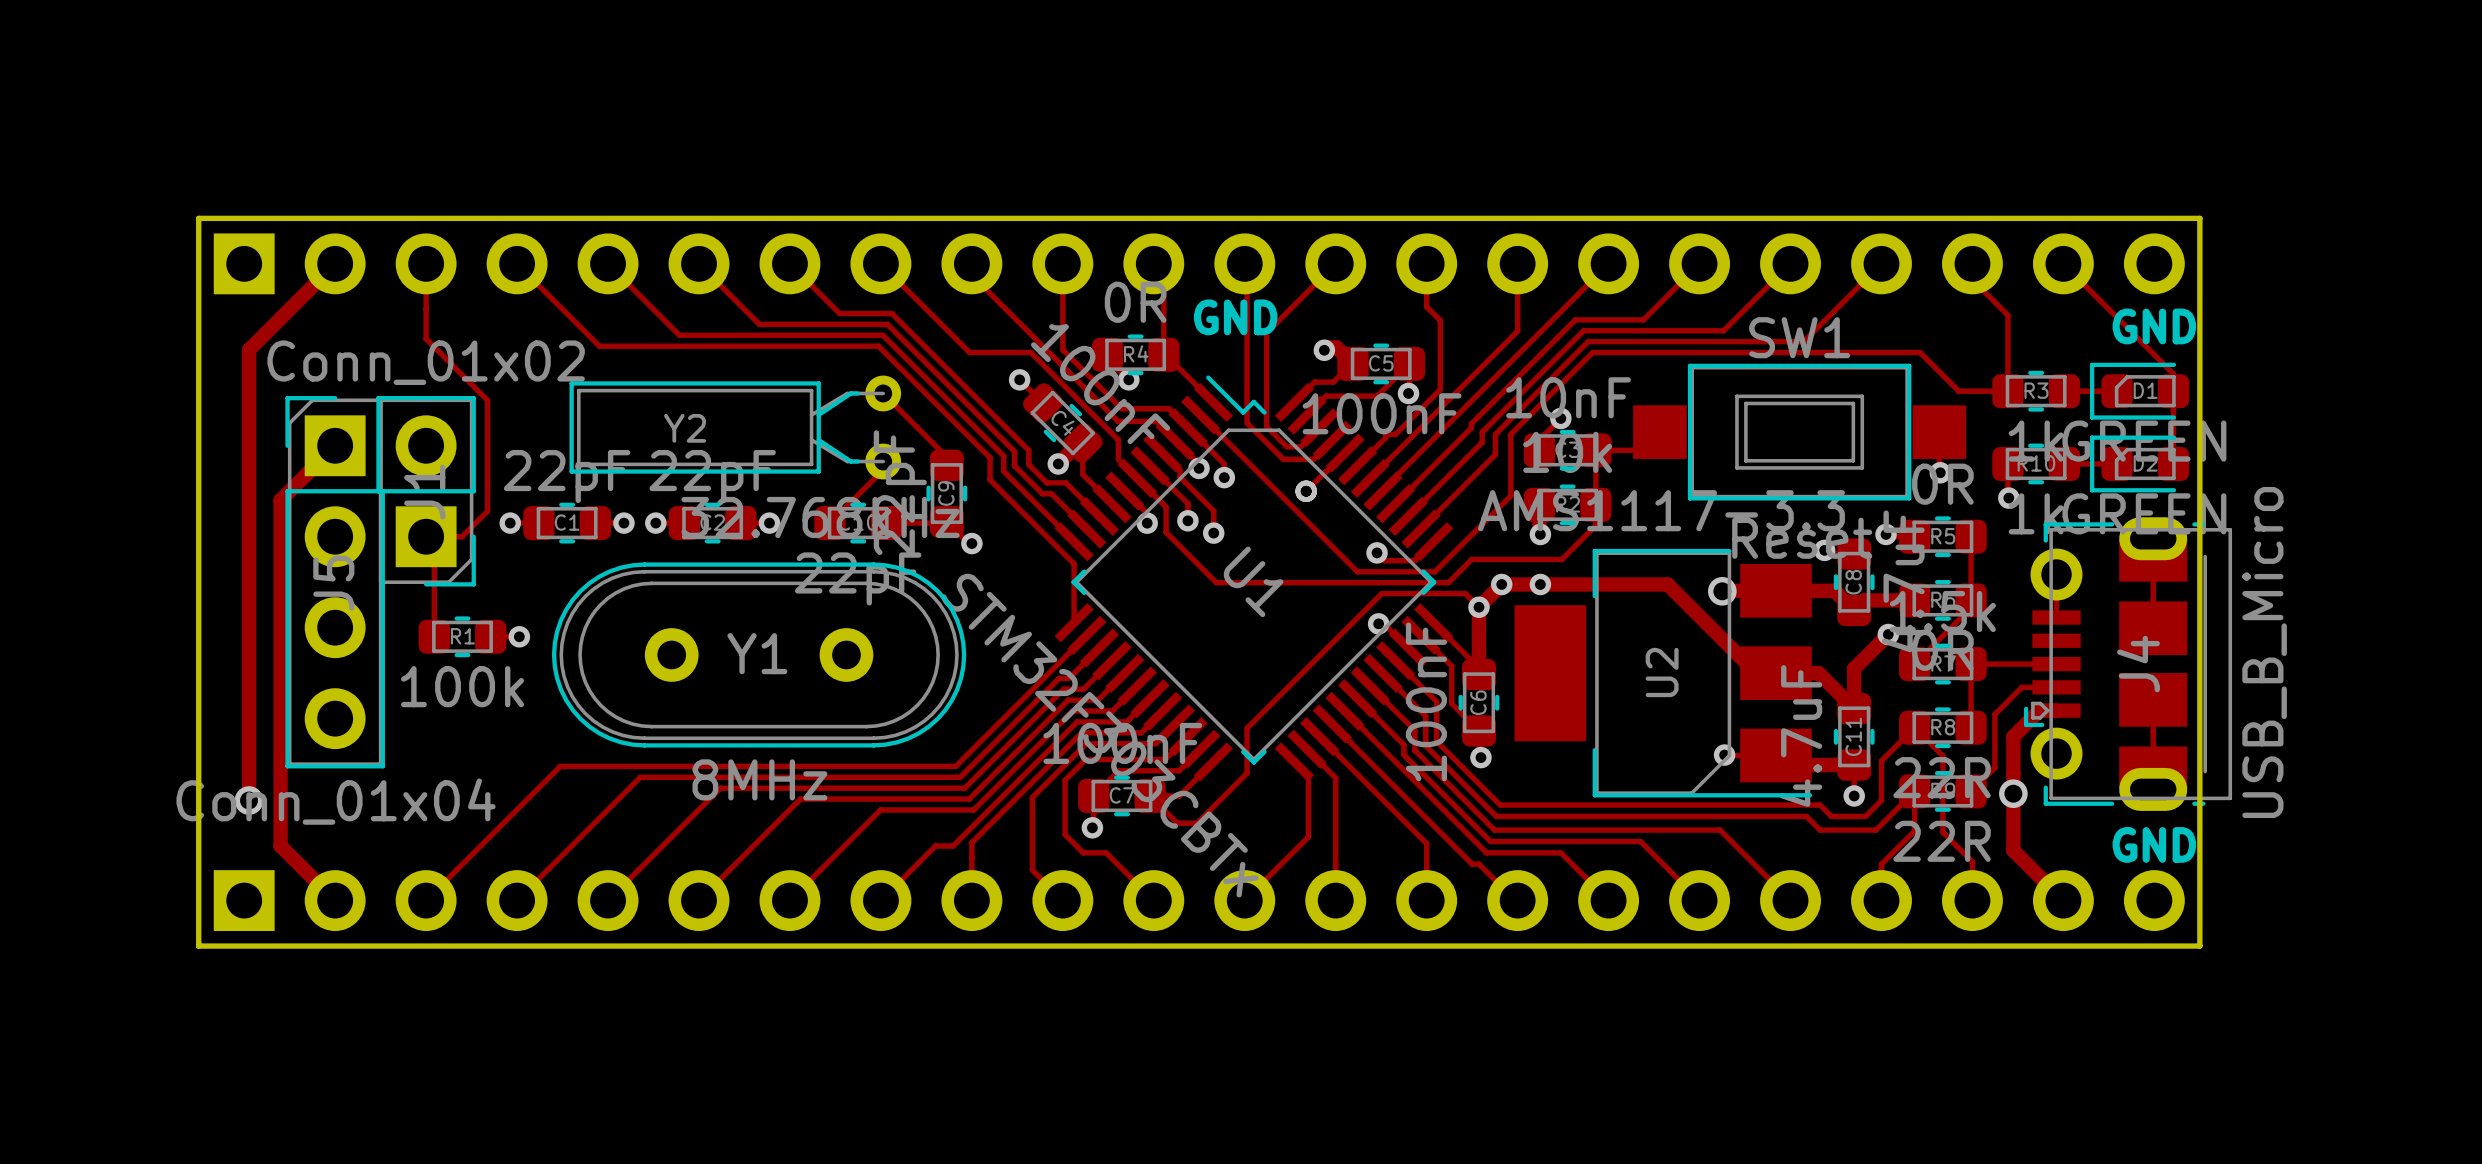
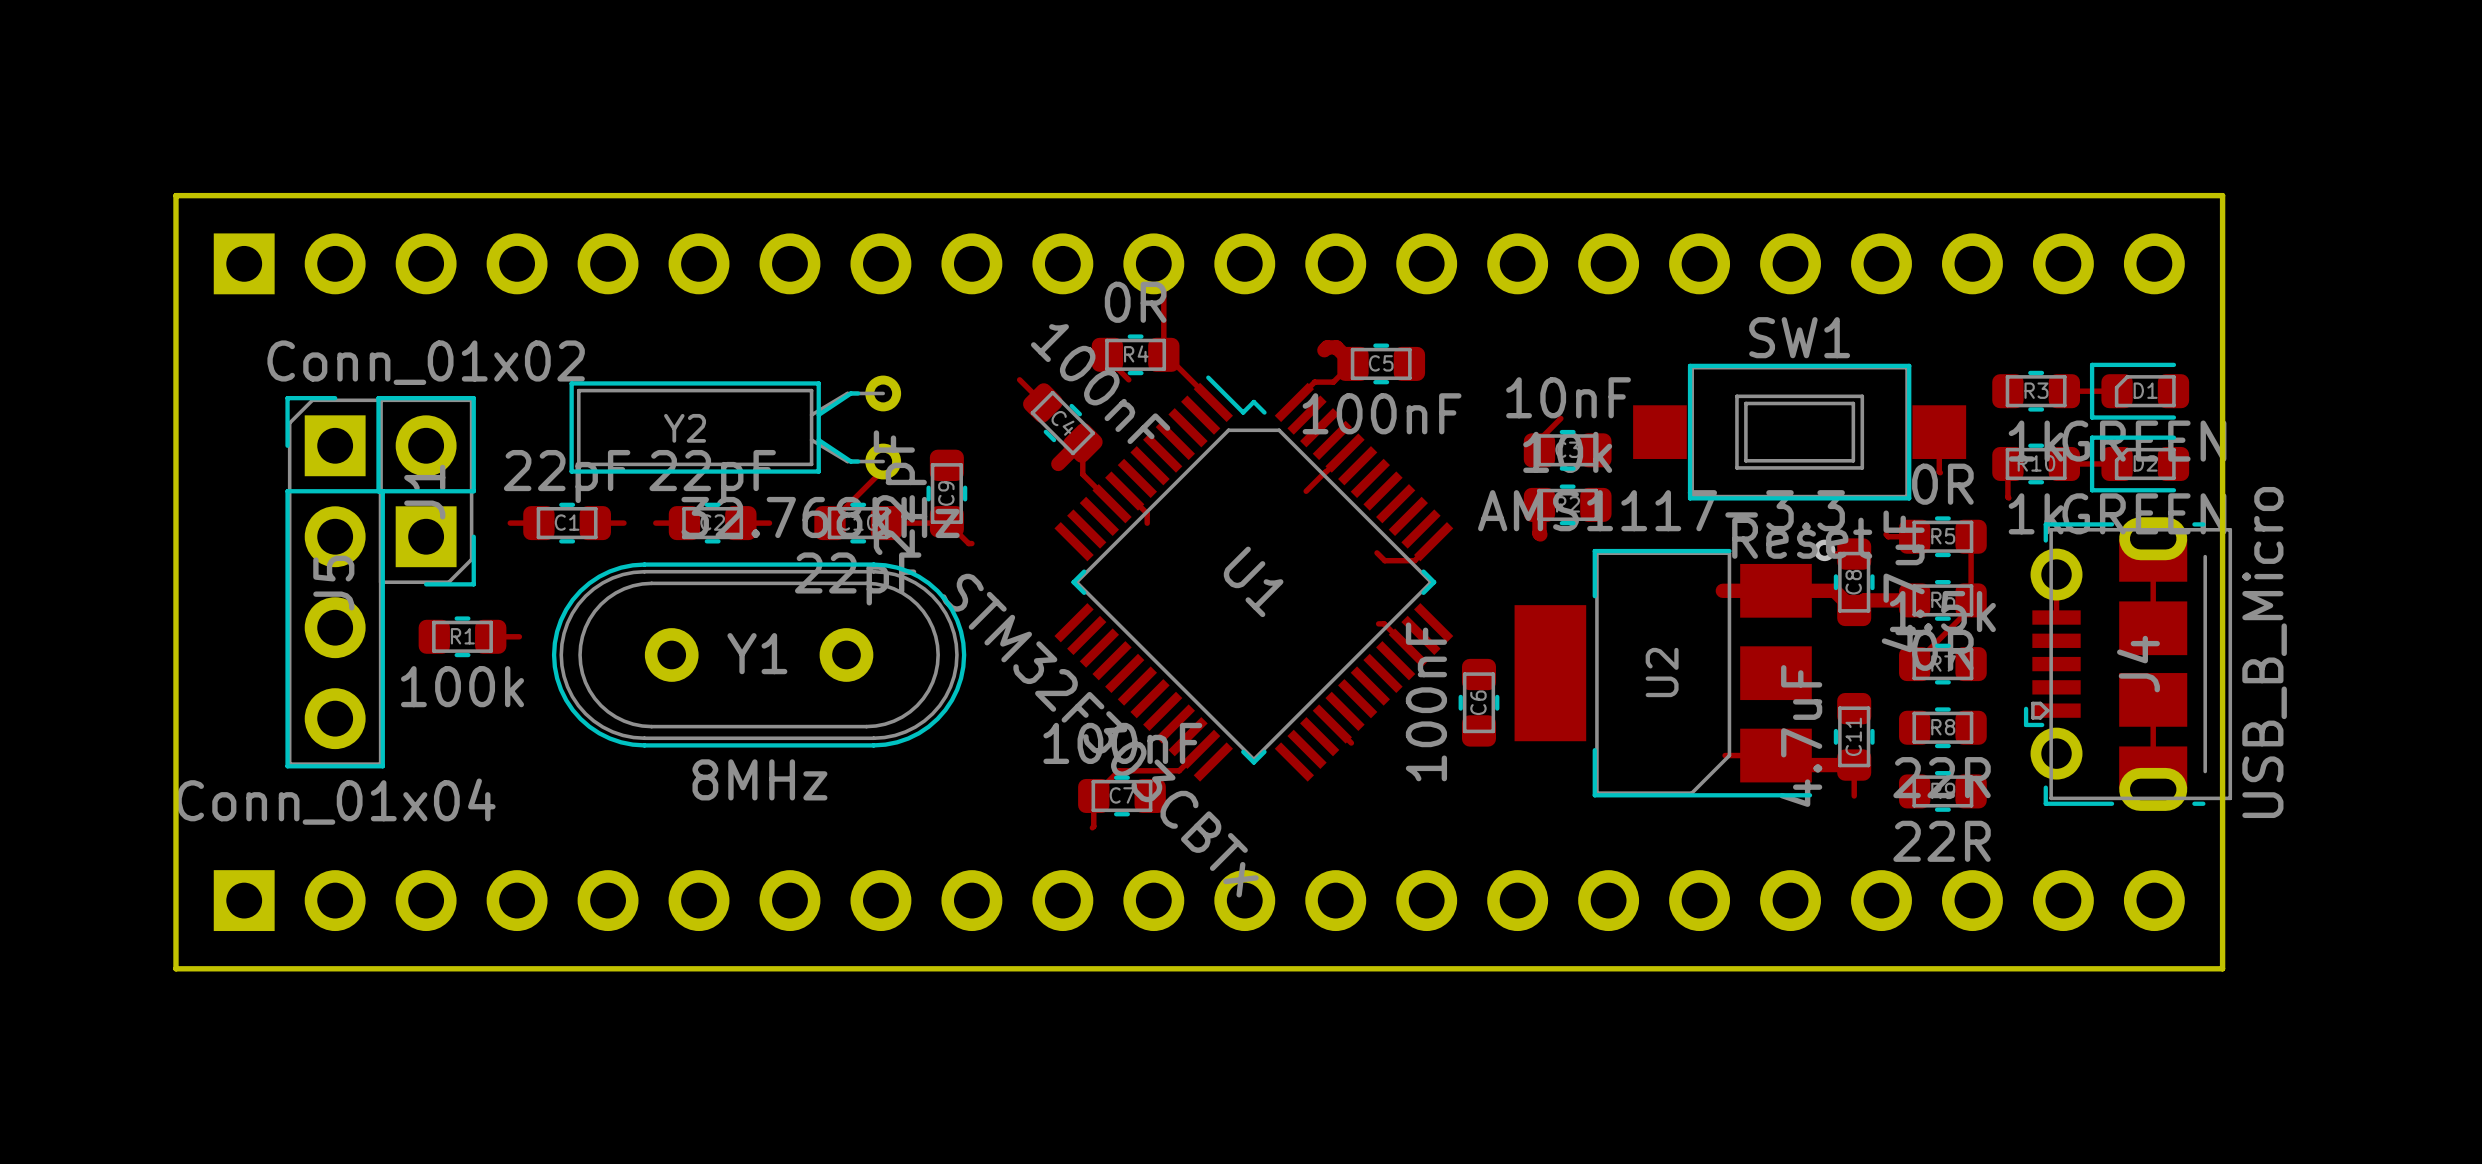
board edge: (198, 218) (198, 946) (2199, 946) (2199, 218) (198, 218) -> (175, 195) (175, 968) (2222, 968) (2222, 195) (175, 195)
track: (335, 263) (249, 350) (249, 800) -> none
track: (426, 263) (426, 338) (487, 400) (487, 511) (462, 536) (426, 536) (434, 544) (434, 636) -> none
track: (517, 263) (599, 346) (878, 346) (990, 457) (990, 479) (1074, 563) (1074, 622) -> none
track: (608, 263) (679, 335) (882, 335) (1003, 456) (1003, 471) (1074, 541) -> none
track: (699, 263) (759, 324) (887, 324) (1014, 451) (1014, 465) (1042, 493) (1051, 493) (1086, 529) -> none
track: (789, 263) (839, 313) (891, 313) (1028, 450) (1028, 464) (1046, 482) (1065, 482) (1099, 516) -> none
track: (880, 263) (969, 352) (1031, 352) (1118, 439) (1118, 459) (1166, 507) (1166, 532) (1216, 582) (1448, 582) (1471, 559) (1561, 559) (1595, 525) (1595, 450) (1641, 450) (1659, 432) -> none
track: (971, 263) (971, 275) (1118, 421) (1156, 421) (1198, 464) (1198, 468) -> none
track: (1062, 263) (1062, 349) (1121, 408) (1169, 408) (1224, 464) (1224, 477) -> none
track: (1244, 263) (1247, 266) (1247, 423) (1283, 459) (1313, 459) (1332, 440) -> none
track: (1335, 263) (1266, 332) (1266, 426) (1286, 446) (1300, 446) (1319, 427) -> none
track: (1426, 263) (1426, 306) (1440, 320) (1440, 389) (1395, 434) (1385, 434) (1385, 437) (1357, 465) -> none
track: (1517, 263) (1517, 331) (1370, 478) -> none
track: (1608, 263) (1383, 491) -> none
track: (1699, 263) (1643, 319) (1575, 319) (1471, 423) (1471, 428) (1395, 503) -> none
track: (1790, 263) (1723, 330) (1583, 330) (1482, 432) (1482, 442) (1408, 516) -> none
track: (1881, 263) (1803, 341) (1588, 341) (1495, 434) (1495, 454) (1420, 529) -> none
track: (1972, 263) (1972, 279) (2007, 315) (2007, 391) (1958, 391) (1920, 352) (1592, 352) (1510, 434) (1510, 495) (1434, 571) (1357, 571) (1200, 415) -> none
track: (2063, 263) (2173, 373) (2173, 463) -> none
text: GND (1235, 317) -> none
text: GND (2154, 326) -> none
via: (1324, 350) -> none
via: (1019, 379) -> none
via: (1128, 379) -> none
track: (883, 393) (946, 457) (946, 465) -> none
track: (1408, 393) (1409, 363) (1377, 396) (1326, 396) (1307, 415) -> none
via: (1408, 393) -> none
via: (1560, 418) -> none
track: (335, 445) (280, 500) (280, 846) (335, 900) -> none
track: (1162, 453) (1180, 470) (1180, 477) (1213, 510) (1213, 533) -> none
via: (1058, 463) -> none
track: (1150, 465) (1187, 503) (1187, 520) -> none
via: (1198, 468) -> none
via: (1940, 472) -> none
via: (1224, 477) -> none
via: (1306, 491) -> none
via: (2008, 498) -> none
via: (1187, 520) -> none
via: (510, 523) -> none
via: (623, 523) -> none
via: (655, 523) -> none
via: (769, 523) -> none
via: (1147, 523) -> none
via: (1213, 533) -> none
via: (1540, 534) -> none
via: (1886, 534) -> none
via: (971, 543) -> none
via: (1377, 552) -> none
via: (1501, 584) -> none
via: (1540, 584) -> none
via: (1722, 591) -> none
track: (1478, 607) (1465, 593) (1381, 593) (1247, 728) (1247, 773) (1197, 823) (1177, 823) (1150, 795) (1179, 795) (1213, 762) -> none
track: (1478, 607) (1478, 674) (1478, 668) (1433, 622) -> none
track: (1478, 607) (1501, 584) (1667, 584) (1756, 673) (1818, 673) (1854, 708) (1854, 668) (1888, 634) -> none
via: (1478, 607) -> none
via: (1378, 623) -> none
via: (1888, 634) -> none
track: (1086, 635) (955, 766) (560, 766) (426, 900) -> none
track: (1420, 635) (1451, 666) (1451, 703) (1478, 730) (1478, 755) (1480, 757) -> none
via: (519, 636) -> none
track: (1099, 648) (1069, 678) (1059, 678) (960, 777) (640, 777) (517, 900) -> none
track: (1112, 660) (1083, 689) (1063, 689) (964, 788) (720, 788) (608, 900) -> none
track: (1395, 660) (1436, 701) (1436, 741) (1500, 805) (1820, 805) (1831, 816) (1865, 816) (1881, 800) (1881, 760) (1914, 727) (1942, 755) (1942, 832) (1972, 861) (1972, 900) -> none
track: (2056, 664) (1971, 664) (1971, 727) -> none
track: (1124, 673) (1097, 700) (1068, 700) (969, 799) (800, 799) (699, 900) -> none
track: (1383, 673) (1425, 716) (1425, 745) (1496, 816) (1806, 816) (1820, 830) (1876, 830) (1914, 791) (1914, 831) (1881, 864) (1881, 900) -> none
track: (1137, 686) (1112, 711) (1072, 711) (973, 809) (880, 809) (789, 900) -> none
track: (1370, 686) (1414, 730) (1414, 750) (1494, 830) (1720, 830) (1790, 900) -> none
track: (2056, 687) (2021, 687) (1994, 714) (1994, 767) (1971, 790) -> none
track: (1150, 698) (1126, 721) (1077, 721) (953, 846) (935, 846) (880, 900) -> none
track: (1357, 698) (1403, 744) (1403, 754) (1490, 841) (1640, 841) (1699, 900) -> none
track: (2056, 710) (2039, 710) (2013, 736) (2013, 850) (2063, 900) -> none
track: (1162, 711) (1141, 732) (1081, 732) (971, 842) (971, 900) -> none
track: (1345, 711) (1486, 852) (1560, 852) (1608, 900) -> none
track: (1175, 724) (1155, 743) (1086, 743) (1032, 797) (1032, 870) (1062, 900) -> none
track: (1188, 736) (1165, 759) (1085, 759) (1065, 780) (1065, 834) (1083, 852) (1106, 852) (1153, 900) -> none
track: (1319, 736) (1426, 843) (1426, 900) -> none
track: (1351, 743) (1472, 864) (1478, 864) (1515, 900) (1517, 900) -> none
track: (1307, 749) (1335, 778) (1335, 900) -> none
via: (1724, 755) -> none
via: (1480, 757) -> none
track: (1294, 762) (1308, 776) (1308, 836) (1244, 900) -> none
via: (2013, 793) -> none
via: (1854, 795) -> none
via: (249, 800) -> none
via: (1092, 827) -> none
text: GND (2154, 844) -> none

